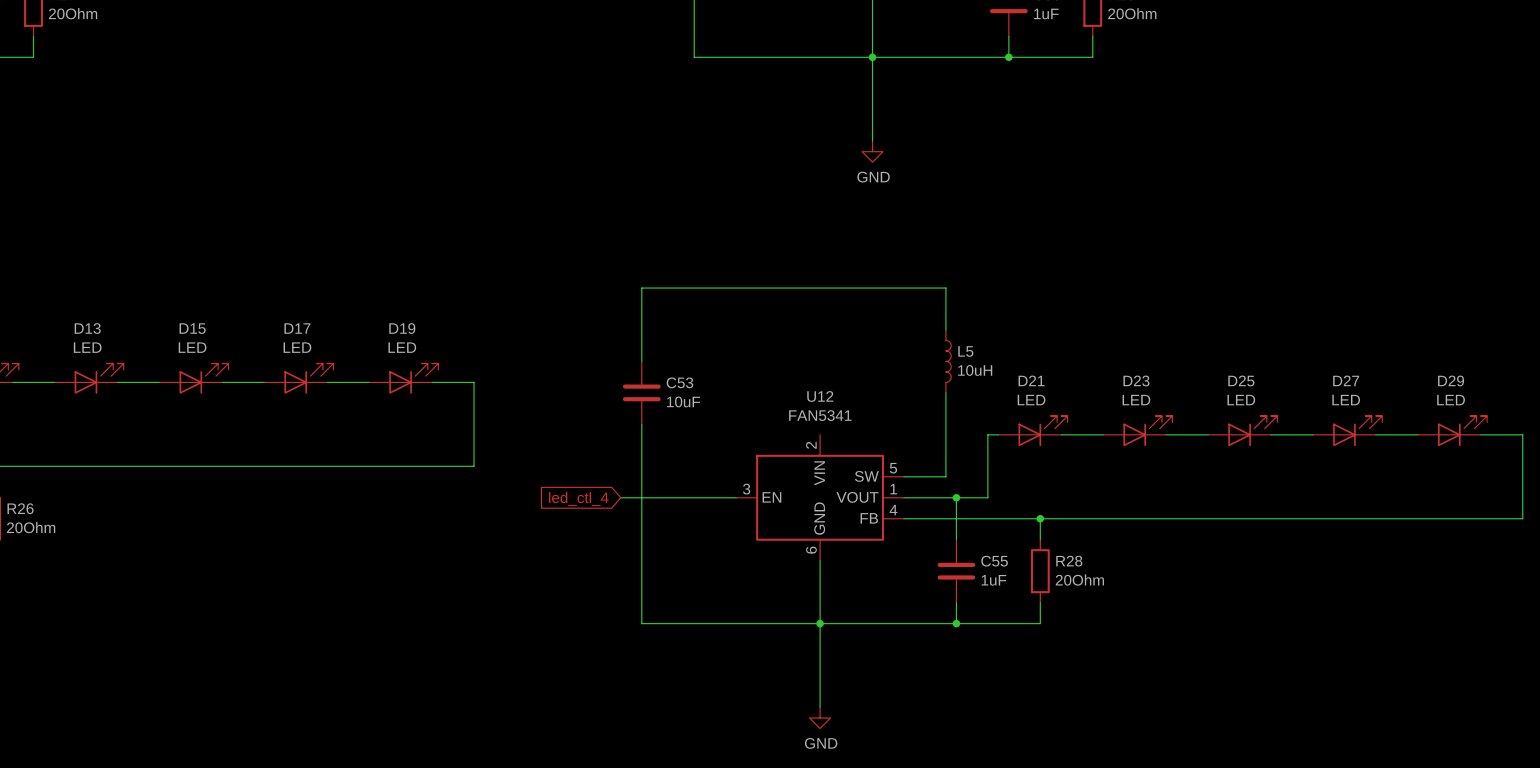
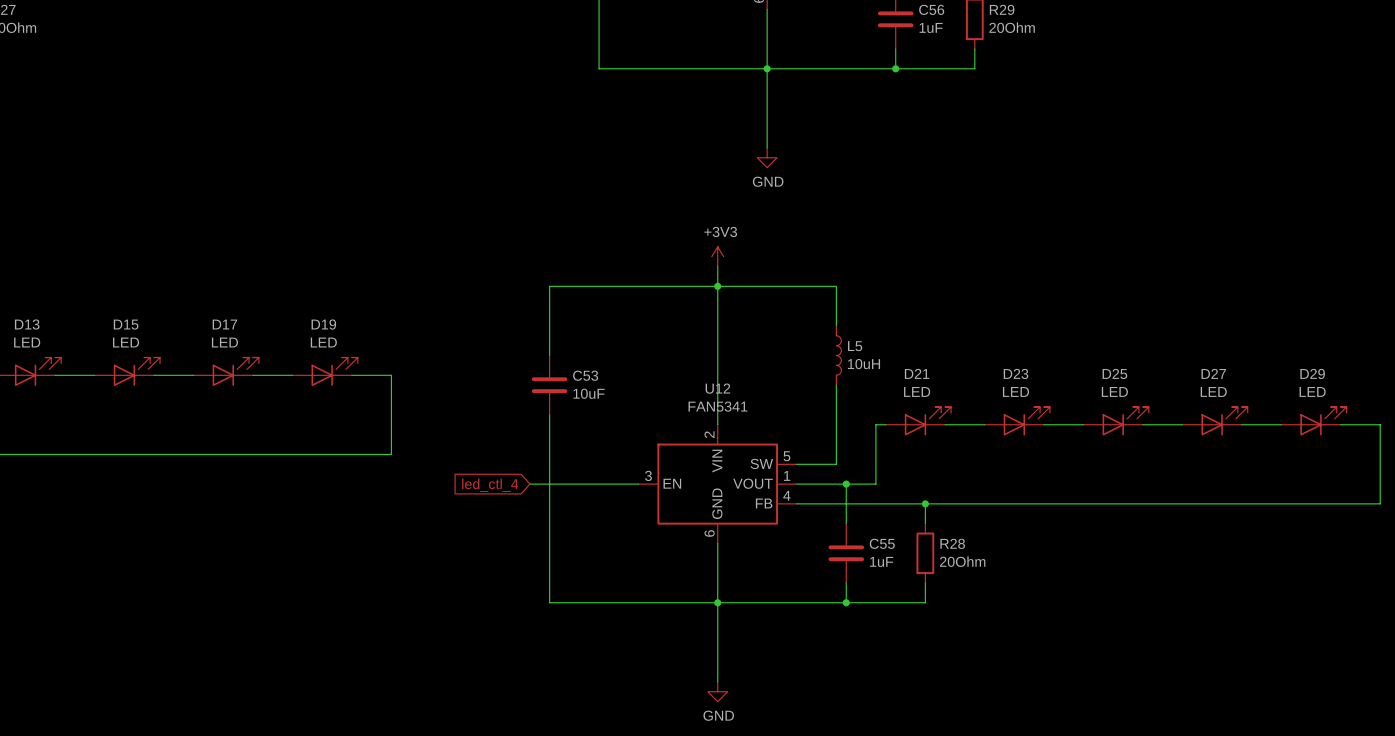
power symbol: none -> +3V3 (717, 256)
wire: none -> (717, 266) (717, 424)
junction: none -> (717, 286)

